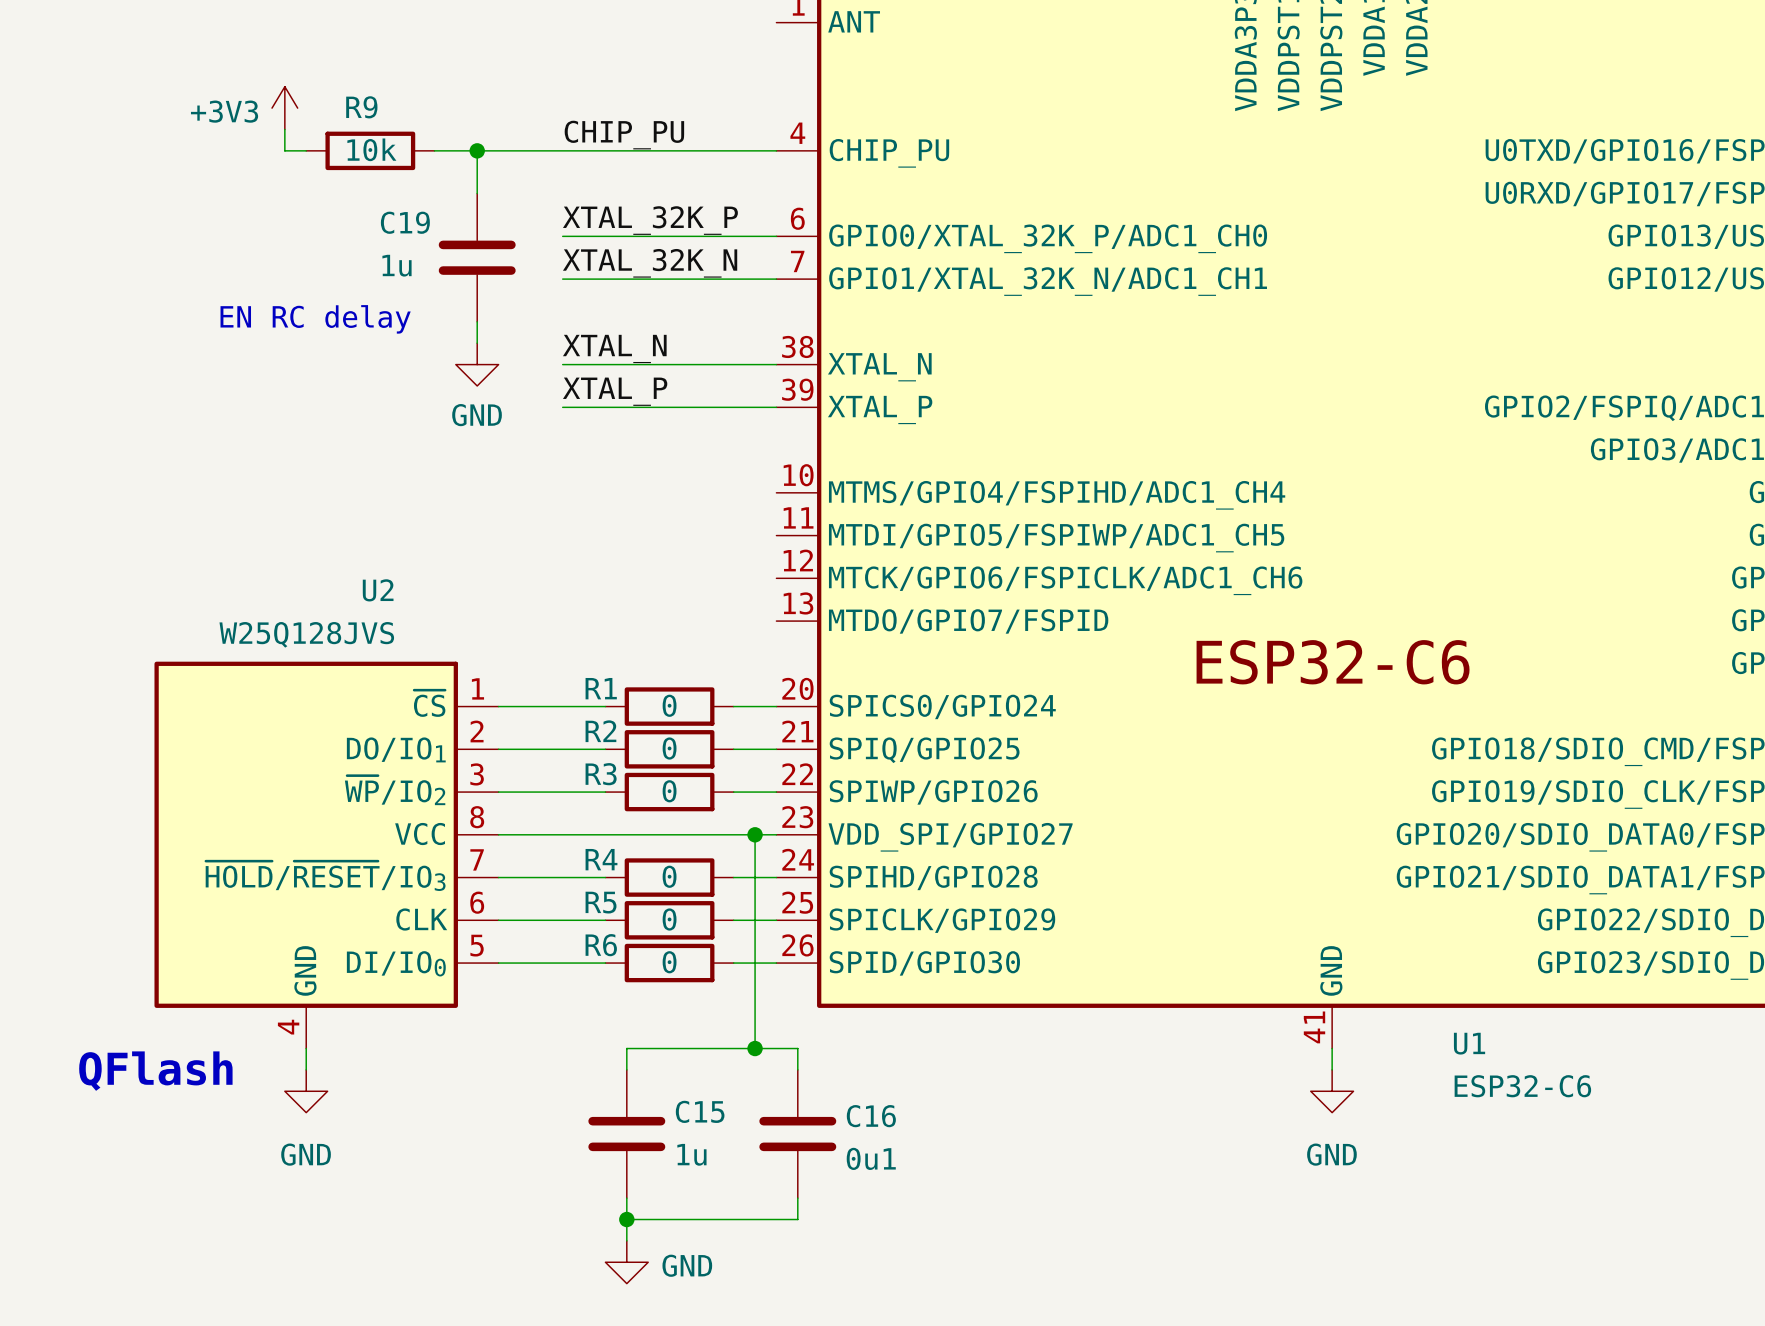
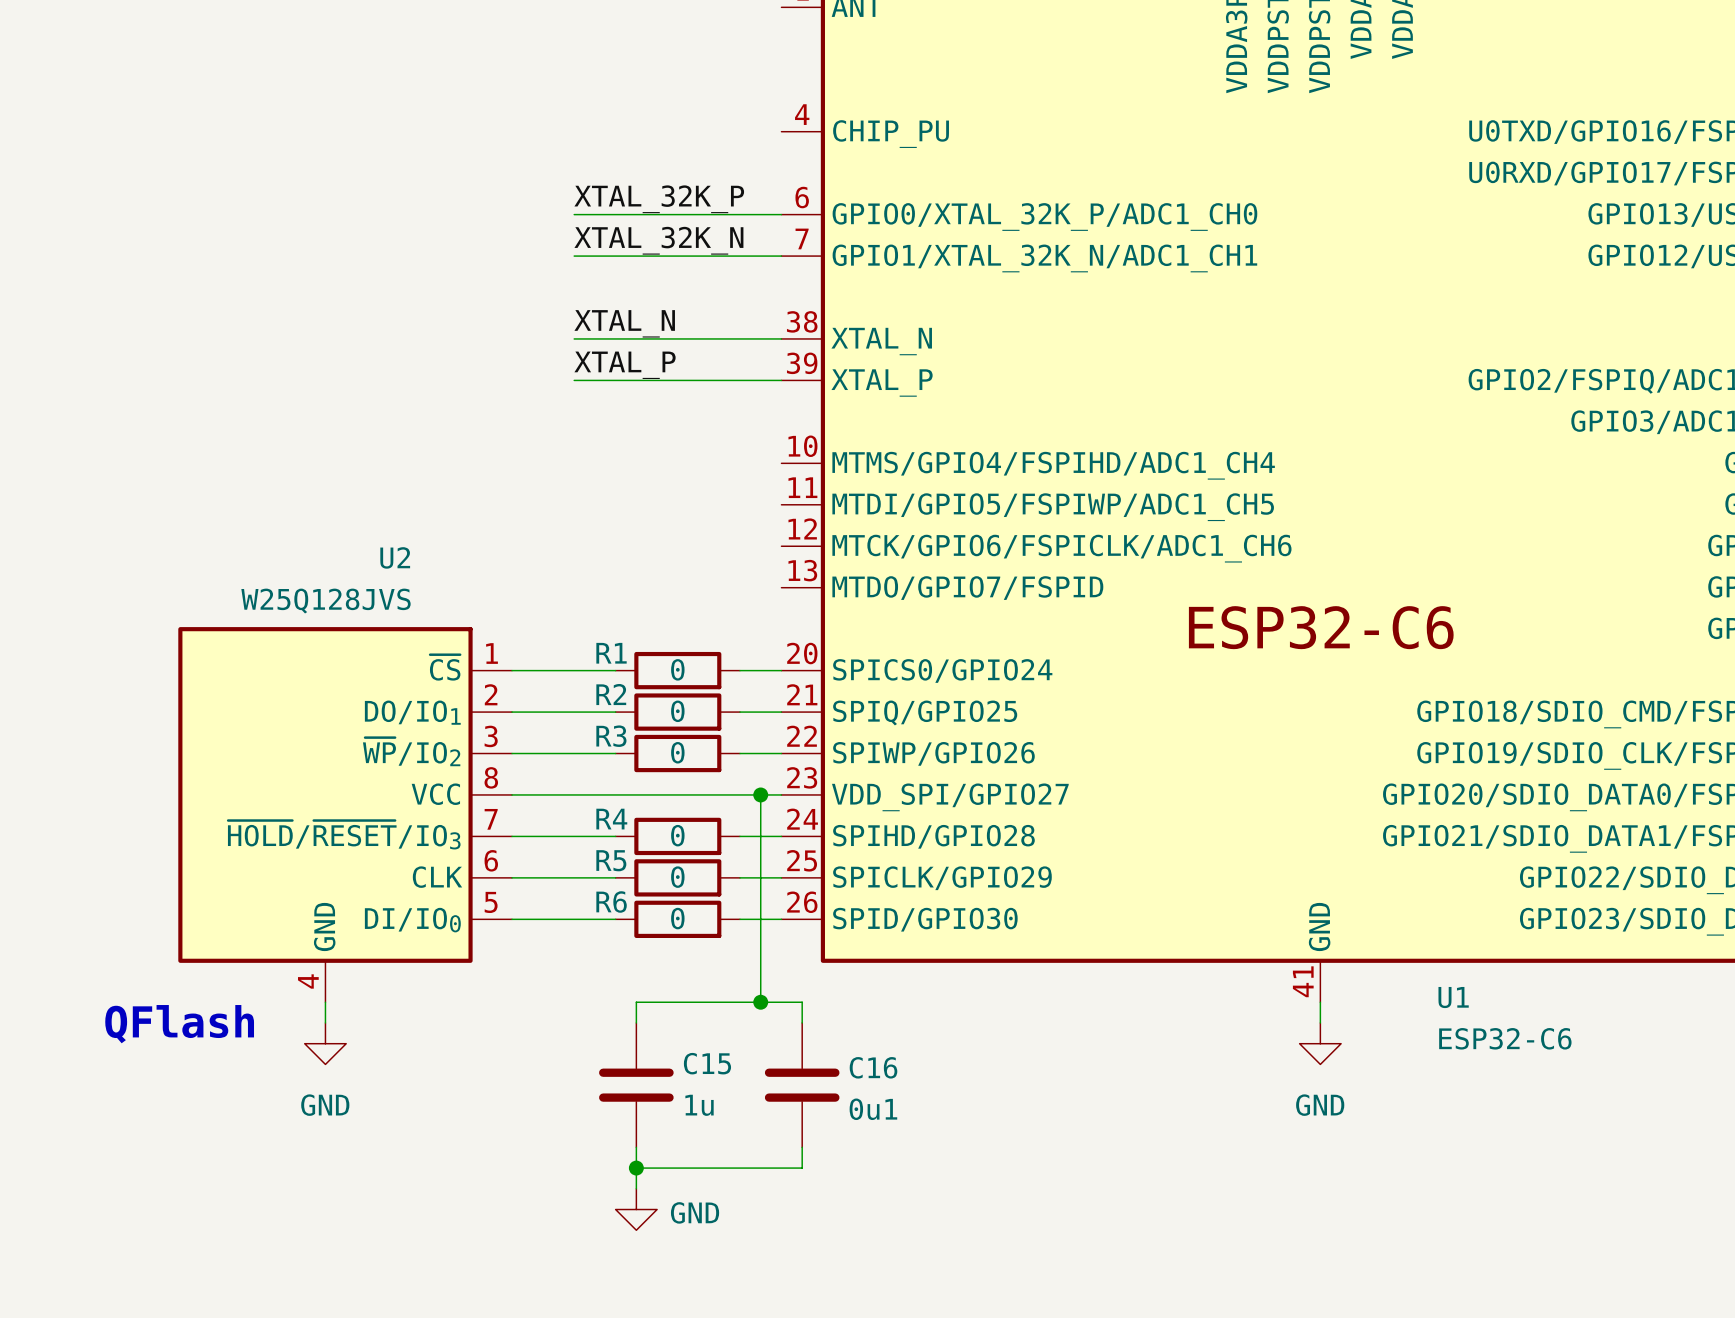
power symbol: +3V3 (284, 108) -> none
wire: (284, 129) (284, 150) (306, 150) -> none
label: CHIP_PU (624, 135) -> none
R9: 10k (370, 150) -> none
wire: (434, 150) (776, 150) -> none
wire: (477, 150) (477, 193) -> none
junction: (477, 150) -> none
C19: 1u (477, 257) -> none
text: EN RC delay (315, 319) -> none
wire: (477, 321) (477, 343) -> none
power symbol: GND (477, 364) -> none

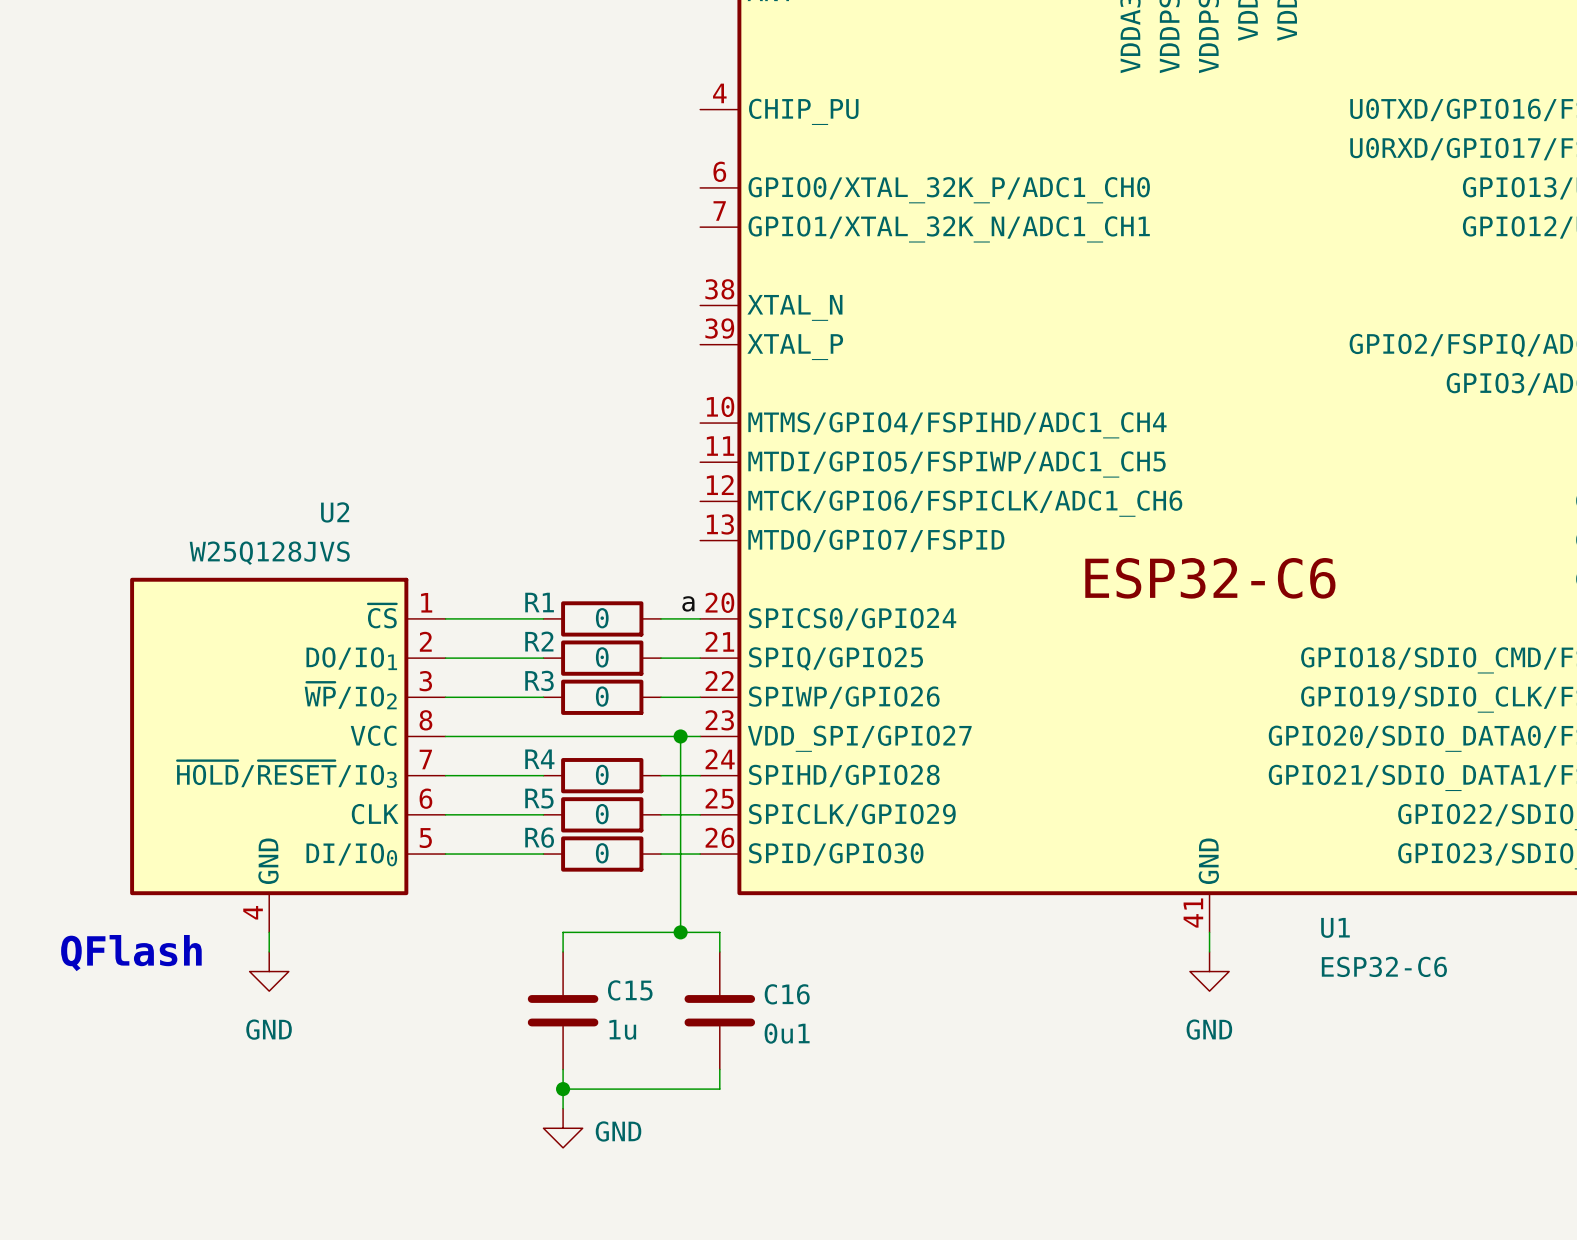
label: XTAL_32K_P (659, 199) -> none
wire: (574, 214) (781, 214) -> none
label: XTAL_32K_N (658, 240) -> none
wire: (574, 256) (781, 256) -> none
label: XTAL_N (624, 323) -> none
wire: (574, 338) (781, 338) -> none
label: XTAL_P (625, 365) -> none
wire: (574, 380) (781, 380) -> none
label: none -> a (688, 603)

